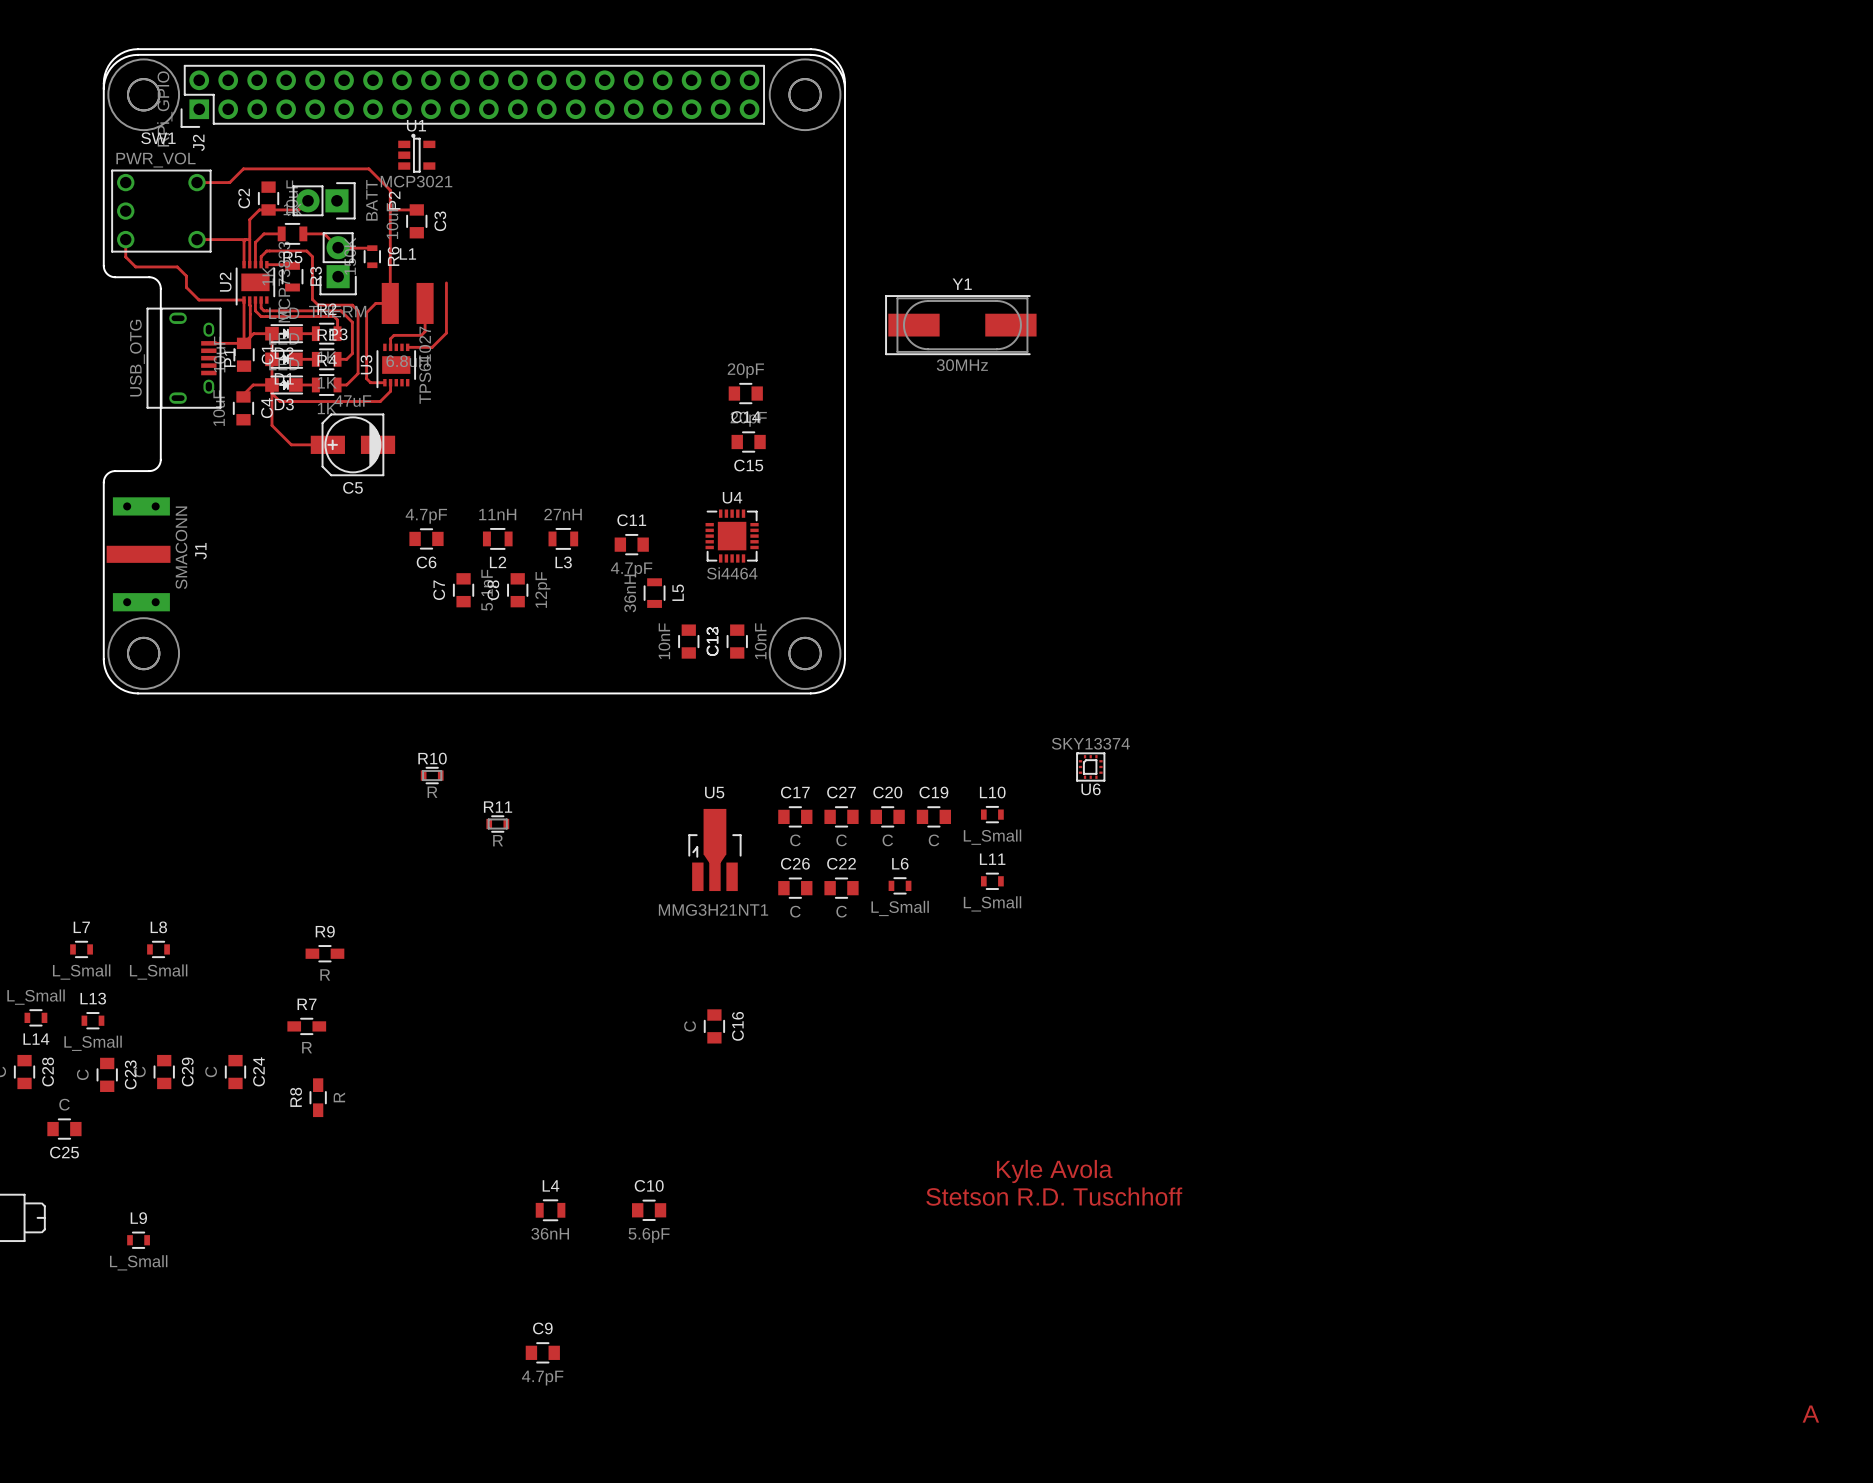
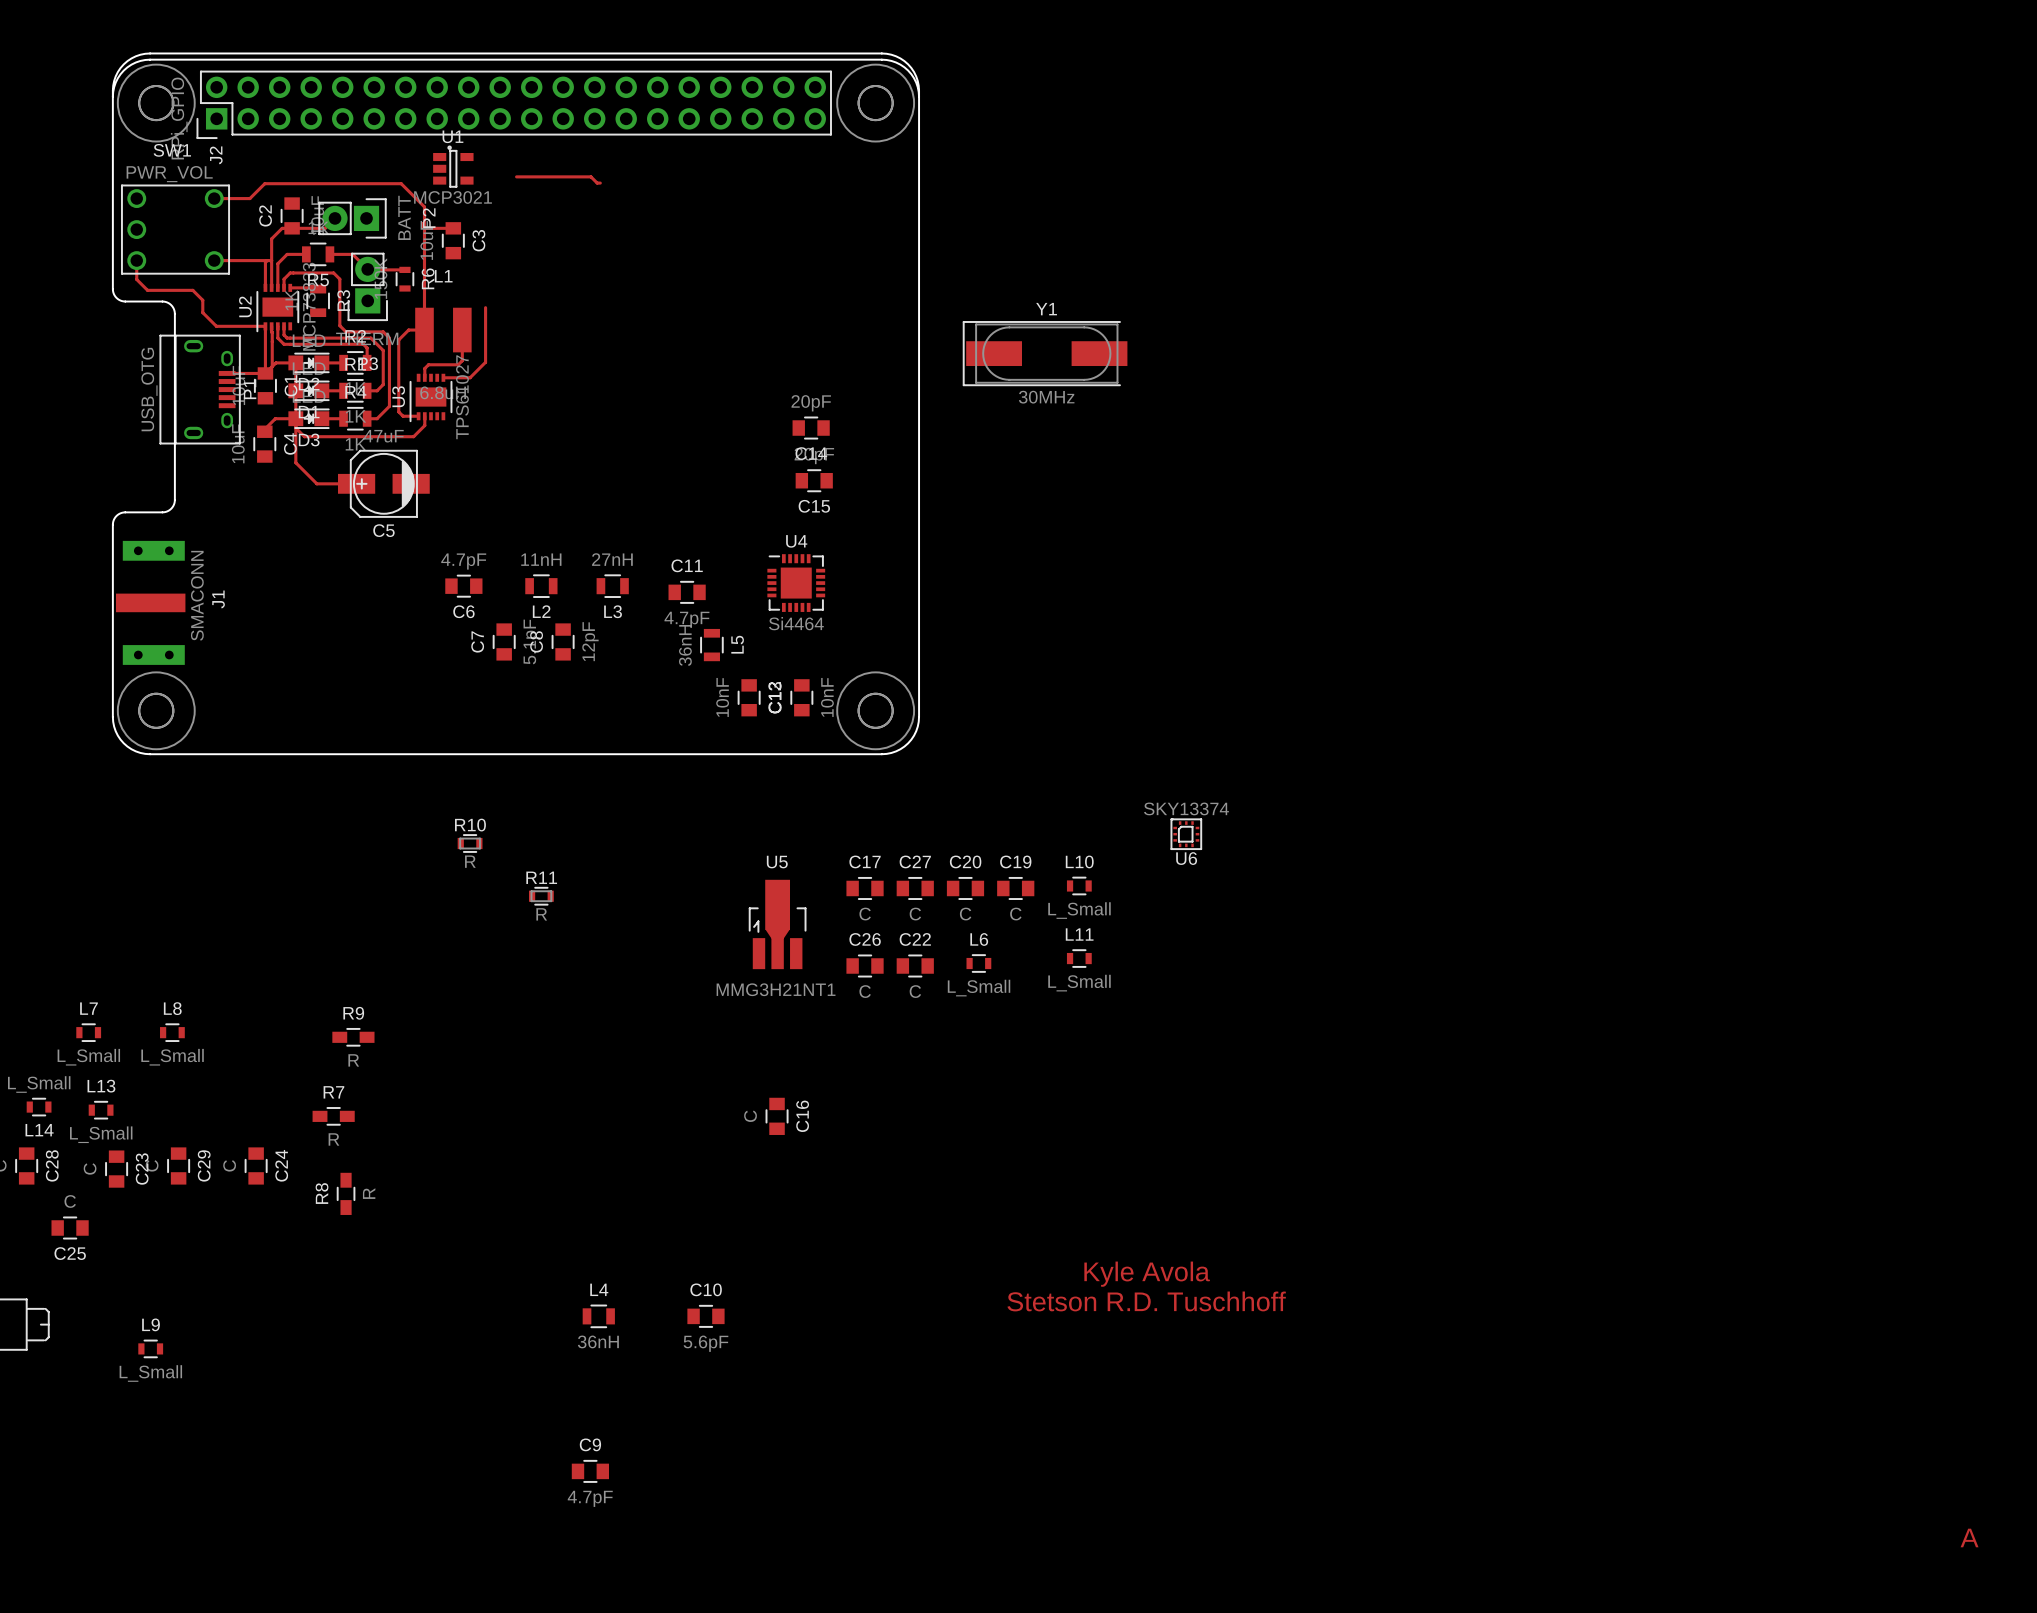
top track: none -> (516, 176) (591, 176) (597, 183) (600, 183)

